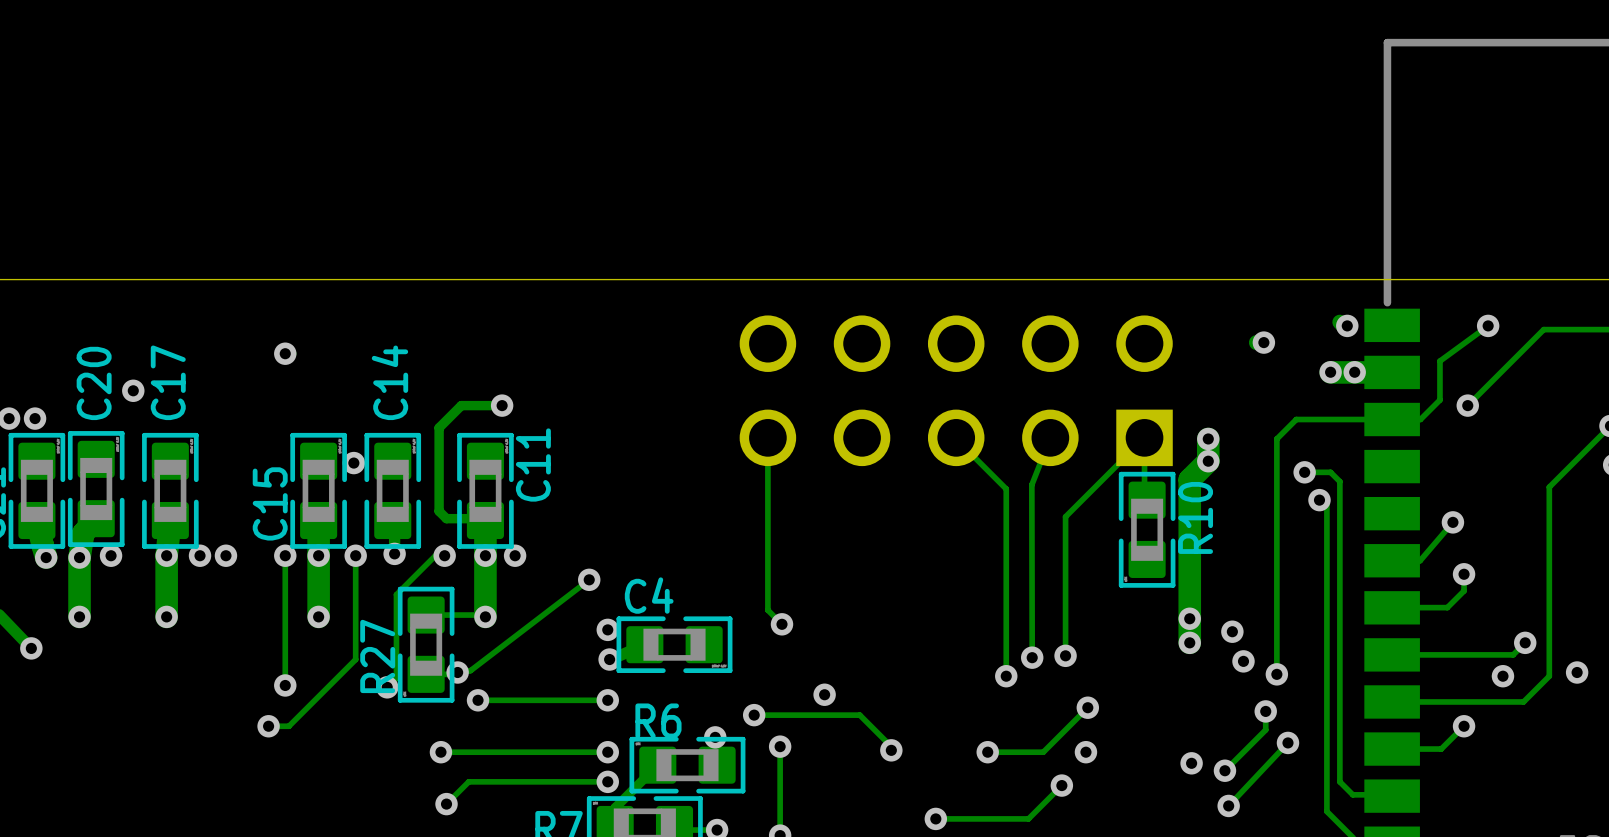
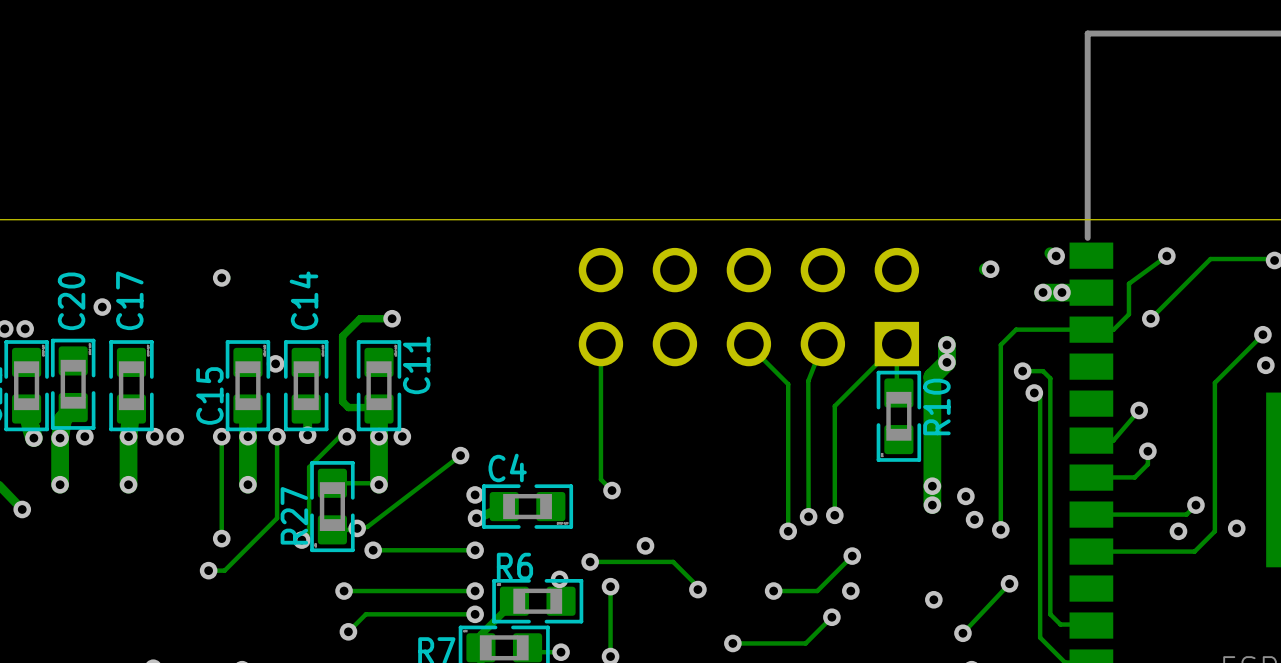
track: (1265, 711) (1265, 729) (1224, 770) -> none
via: (1265, 711) -> none
track: (1464, 726) (1441, 749) (1392, 749) -> none
via: (1464, 726) -> none
via: (1224, 770) -> none

